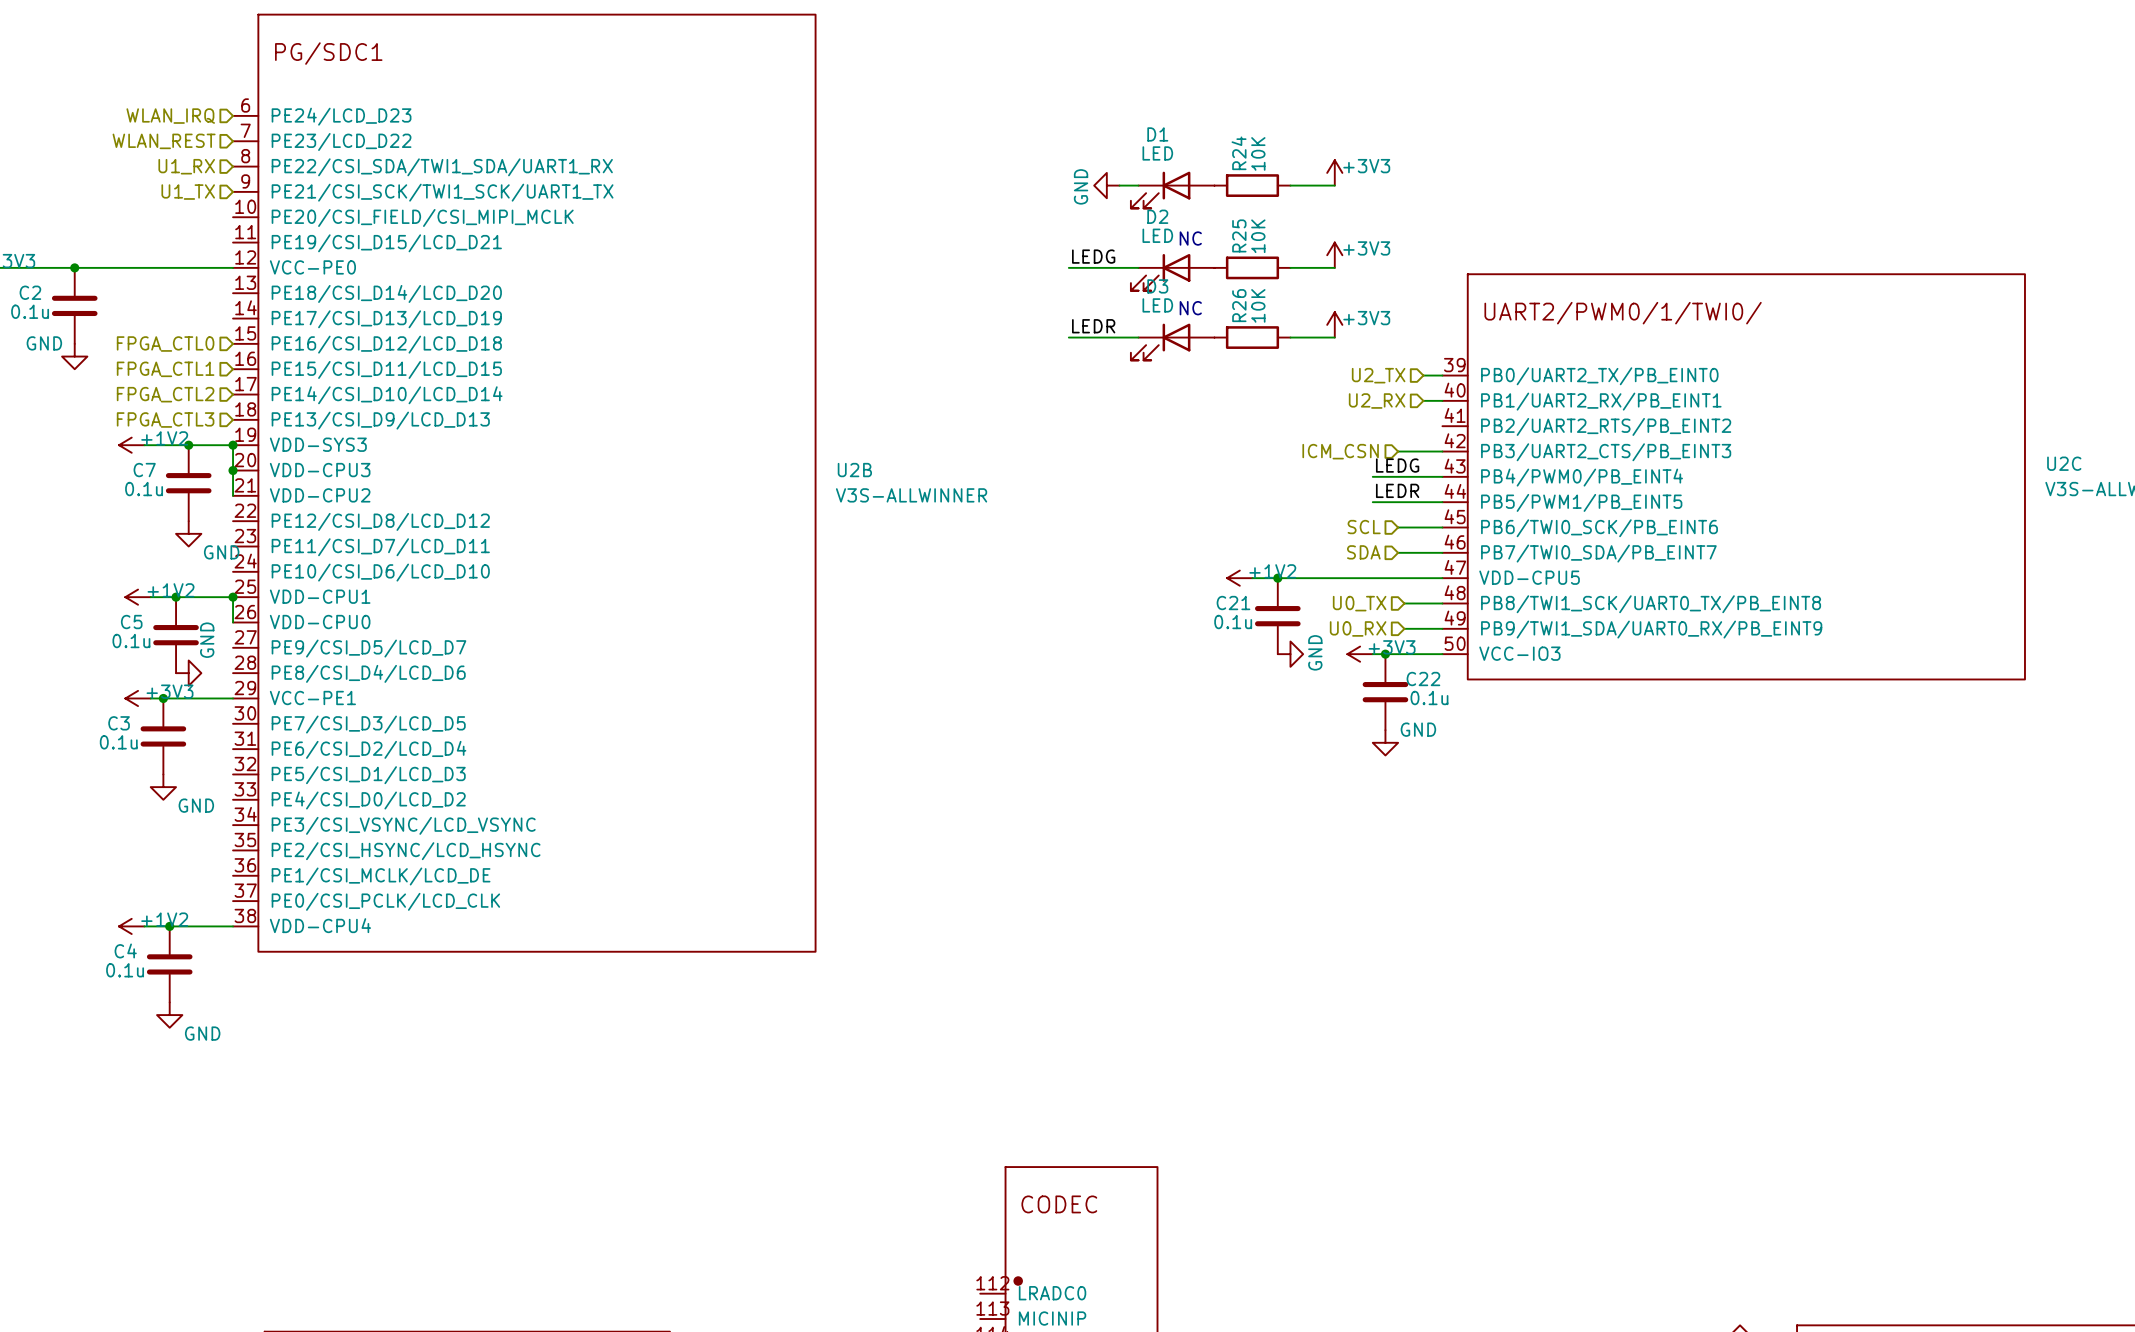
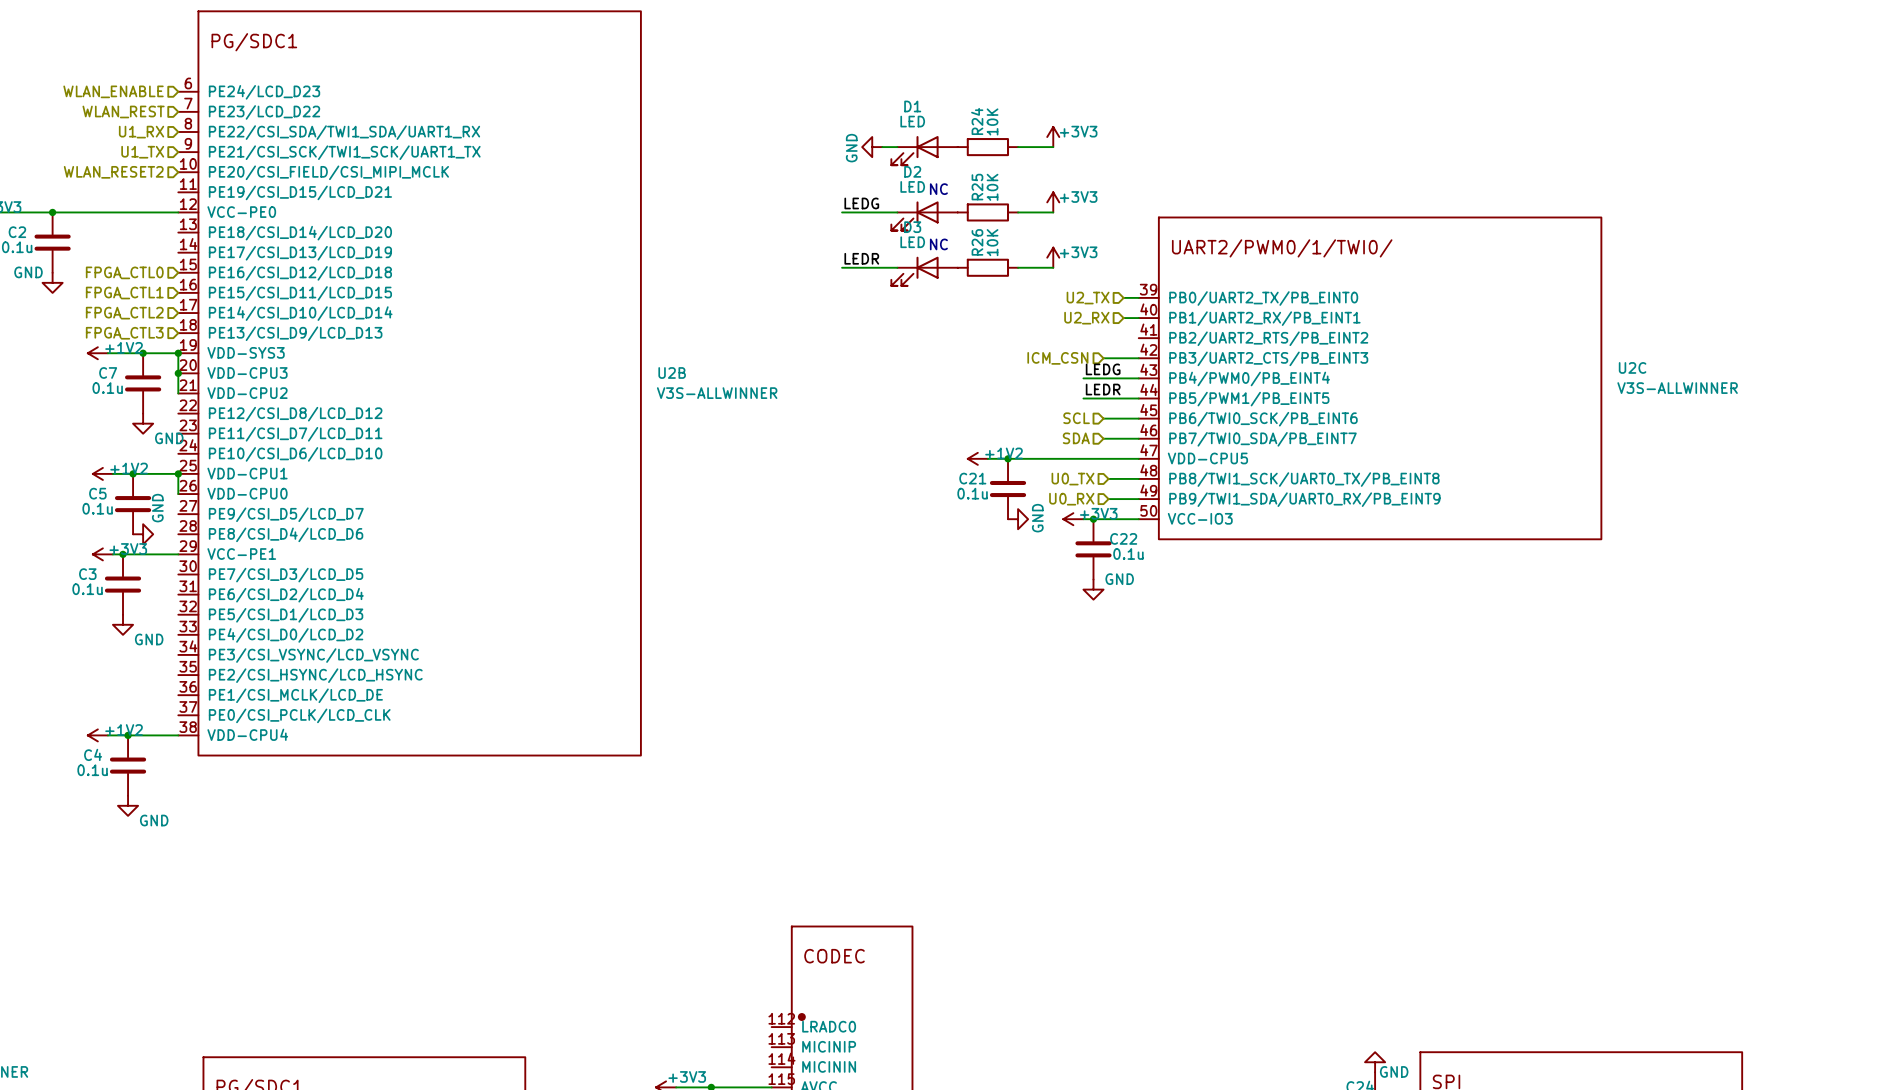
hierarchical label: WLAN_IRQ (170, 116) -> WLAN_ENABLE (113, 91)
hierarchical label: none -> WLAN_RESET2 (113, 172)

